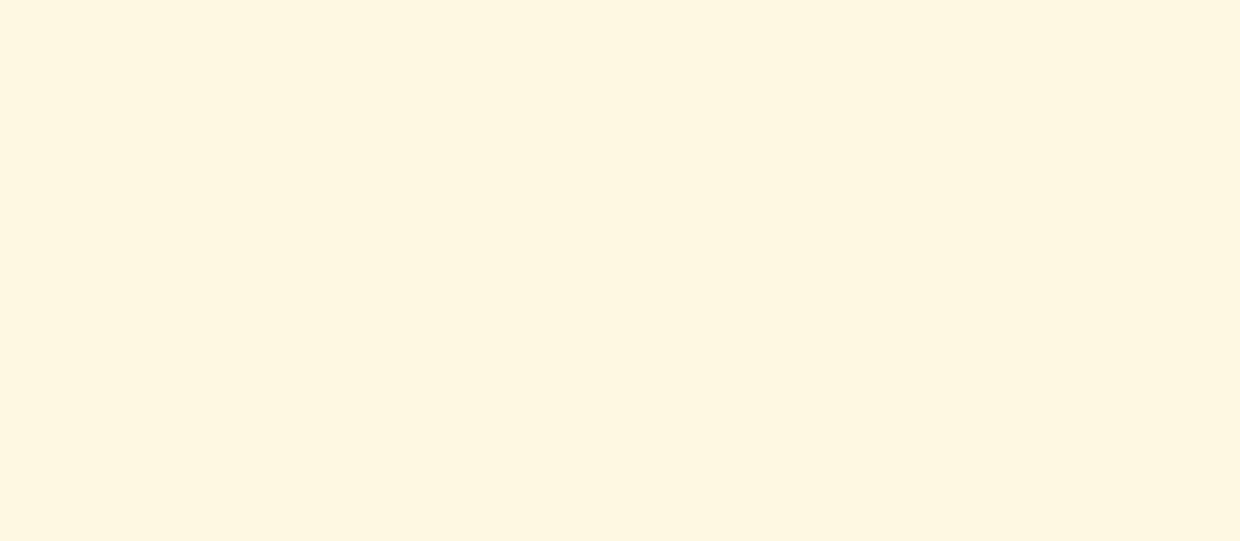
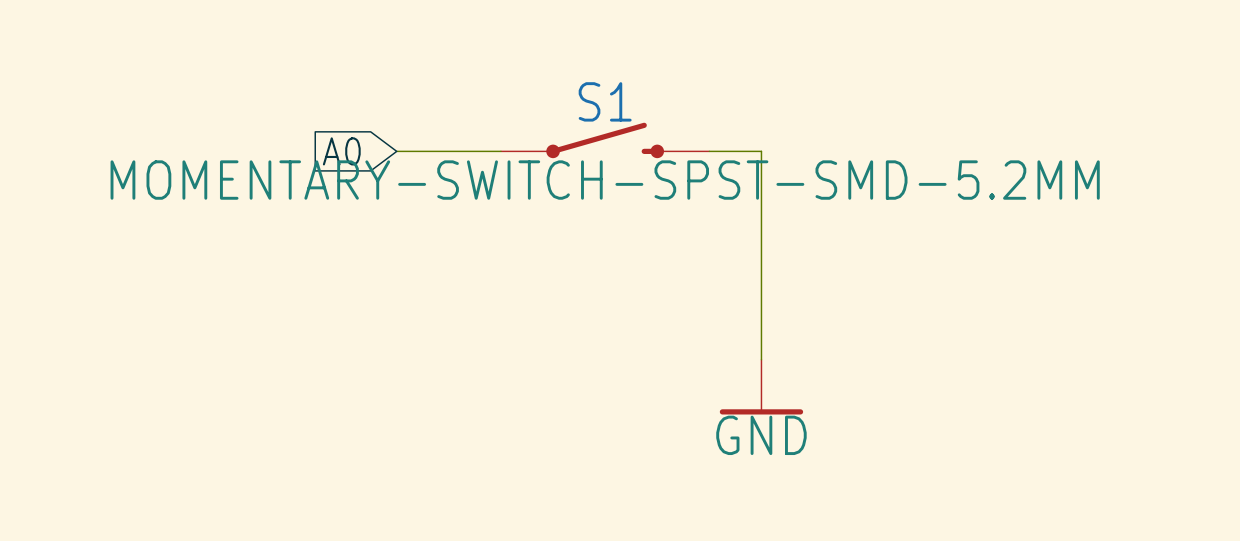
S1: none -> MOMENTARY-SWITCH-SPST-SMD-5.2MM (605, 140)
global label: none -> A0 (341, 151)
wire: none -> (396, 151) (500, 151)
wire: none -> (709, 151) (761, 151) (761, 359)
power symbol: none -> GND (761, 387)

